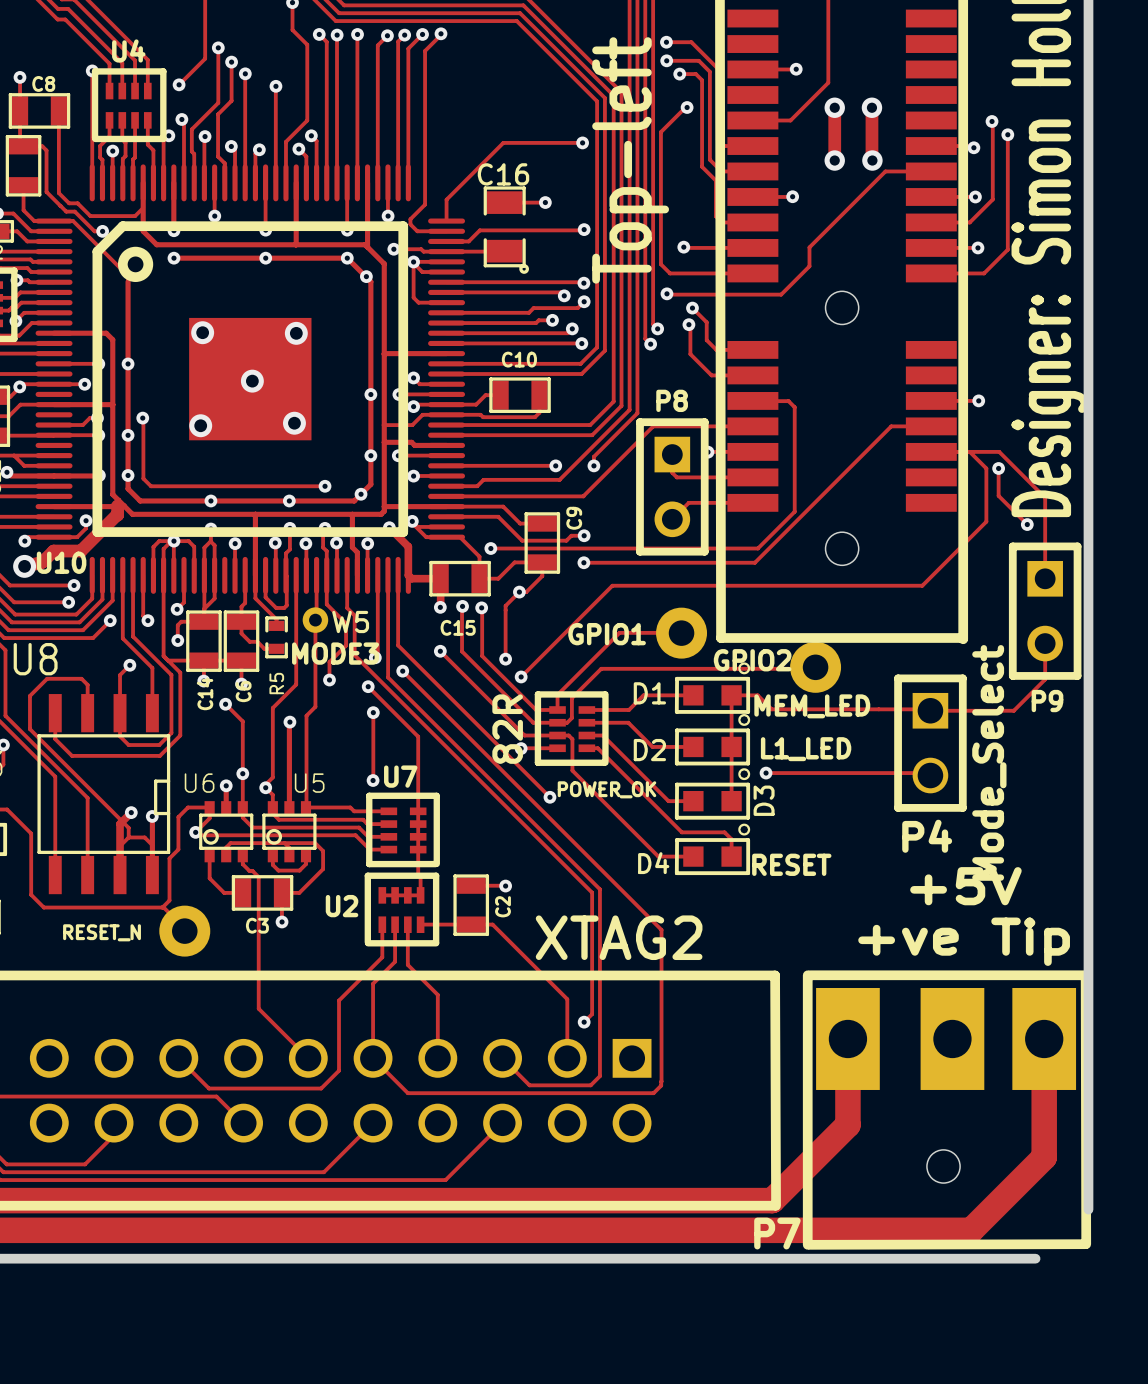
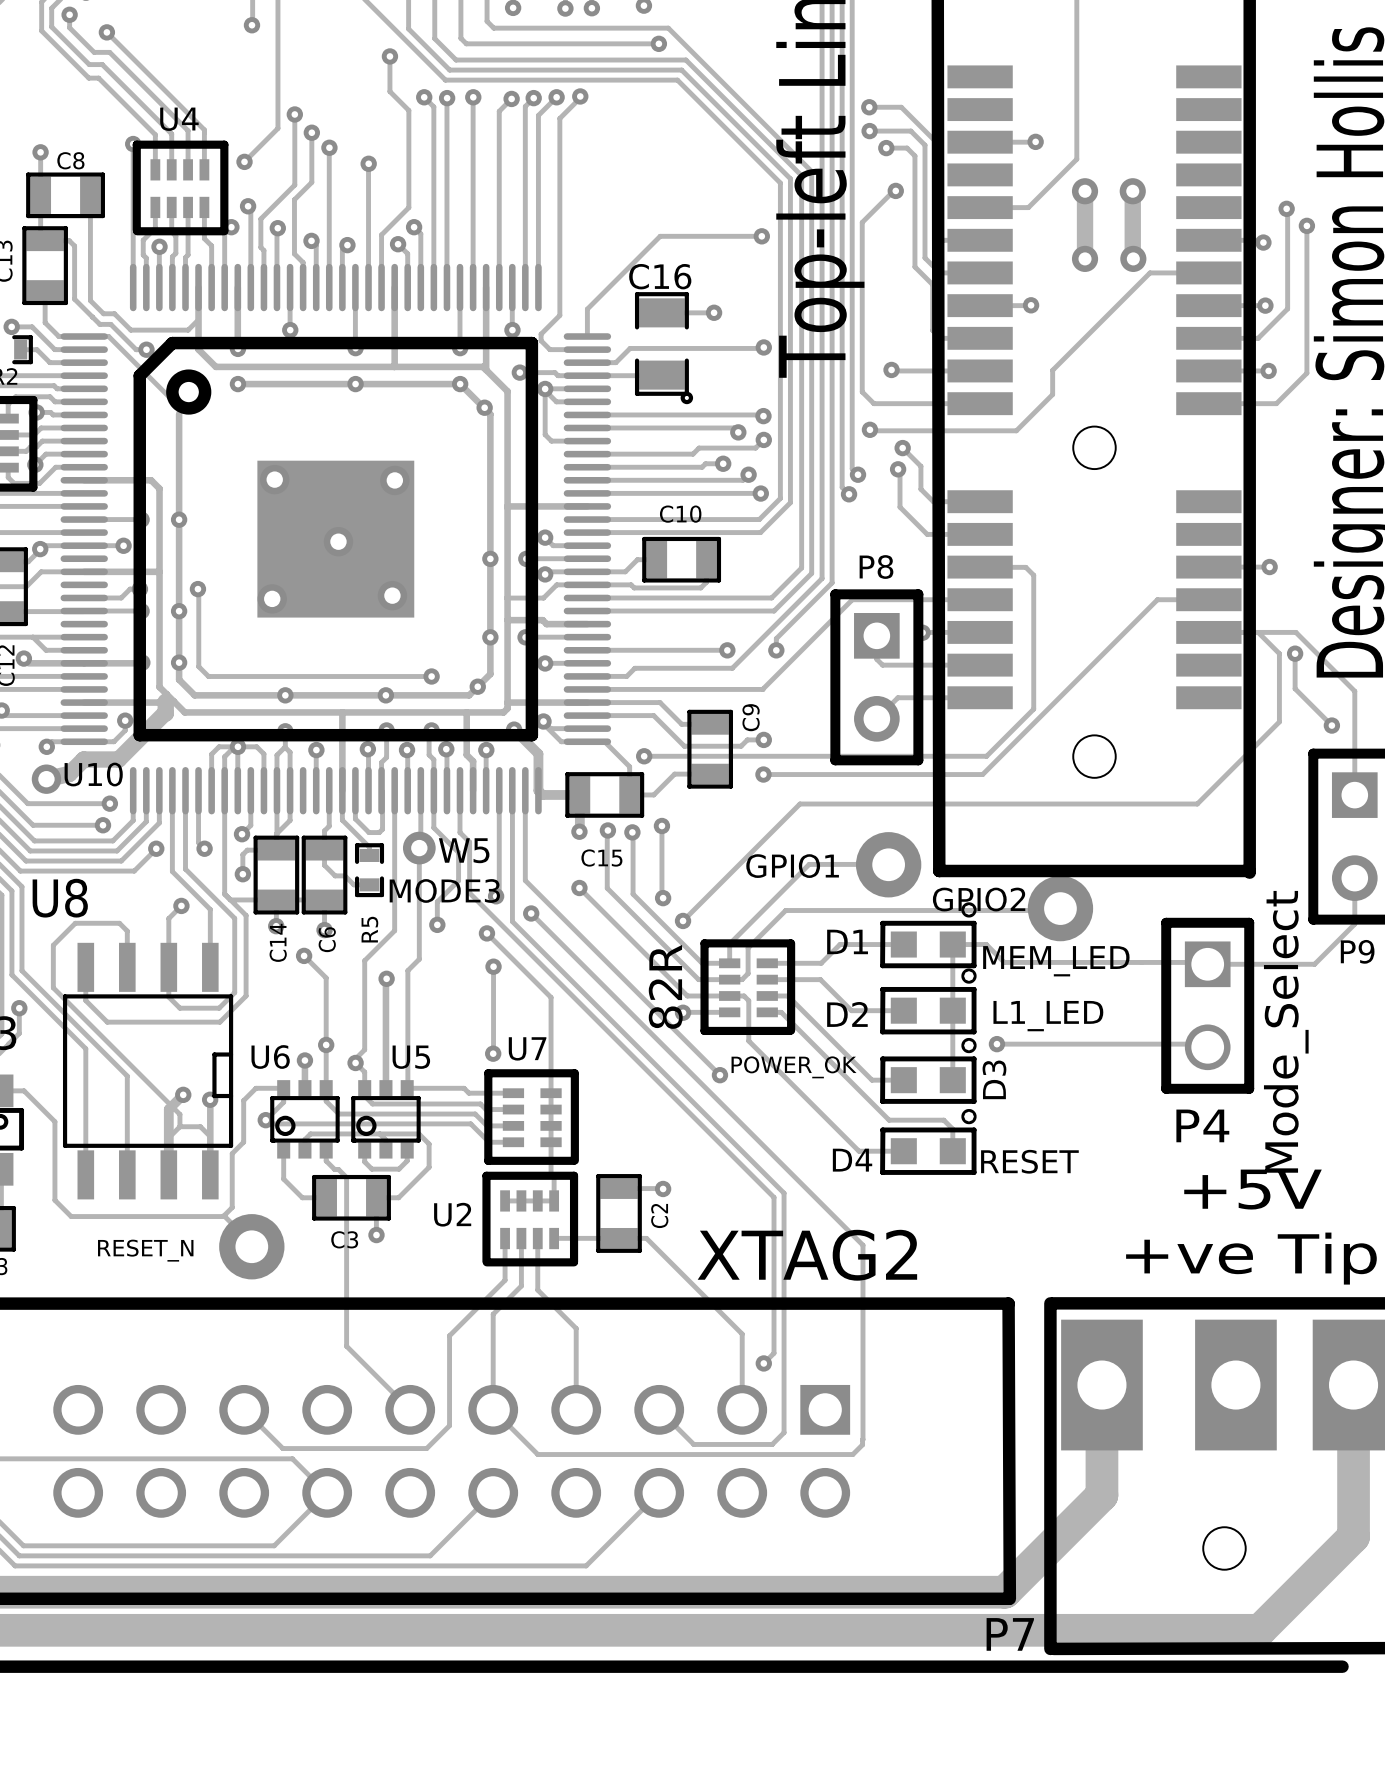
track: (542, 562) (542, 576) (526, 592) (519, 592) (505, 605) (505, 659) -> (661, 826) (661, 898)
via position: (519, 592) -> (661, 826)
track: (114, 1123) (114, 1135) (85, 1164) -> (327, 1492) (274, 1545) (123, 1545)

